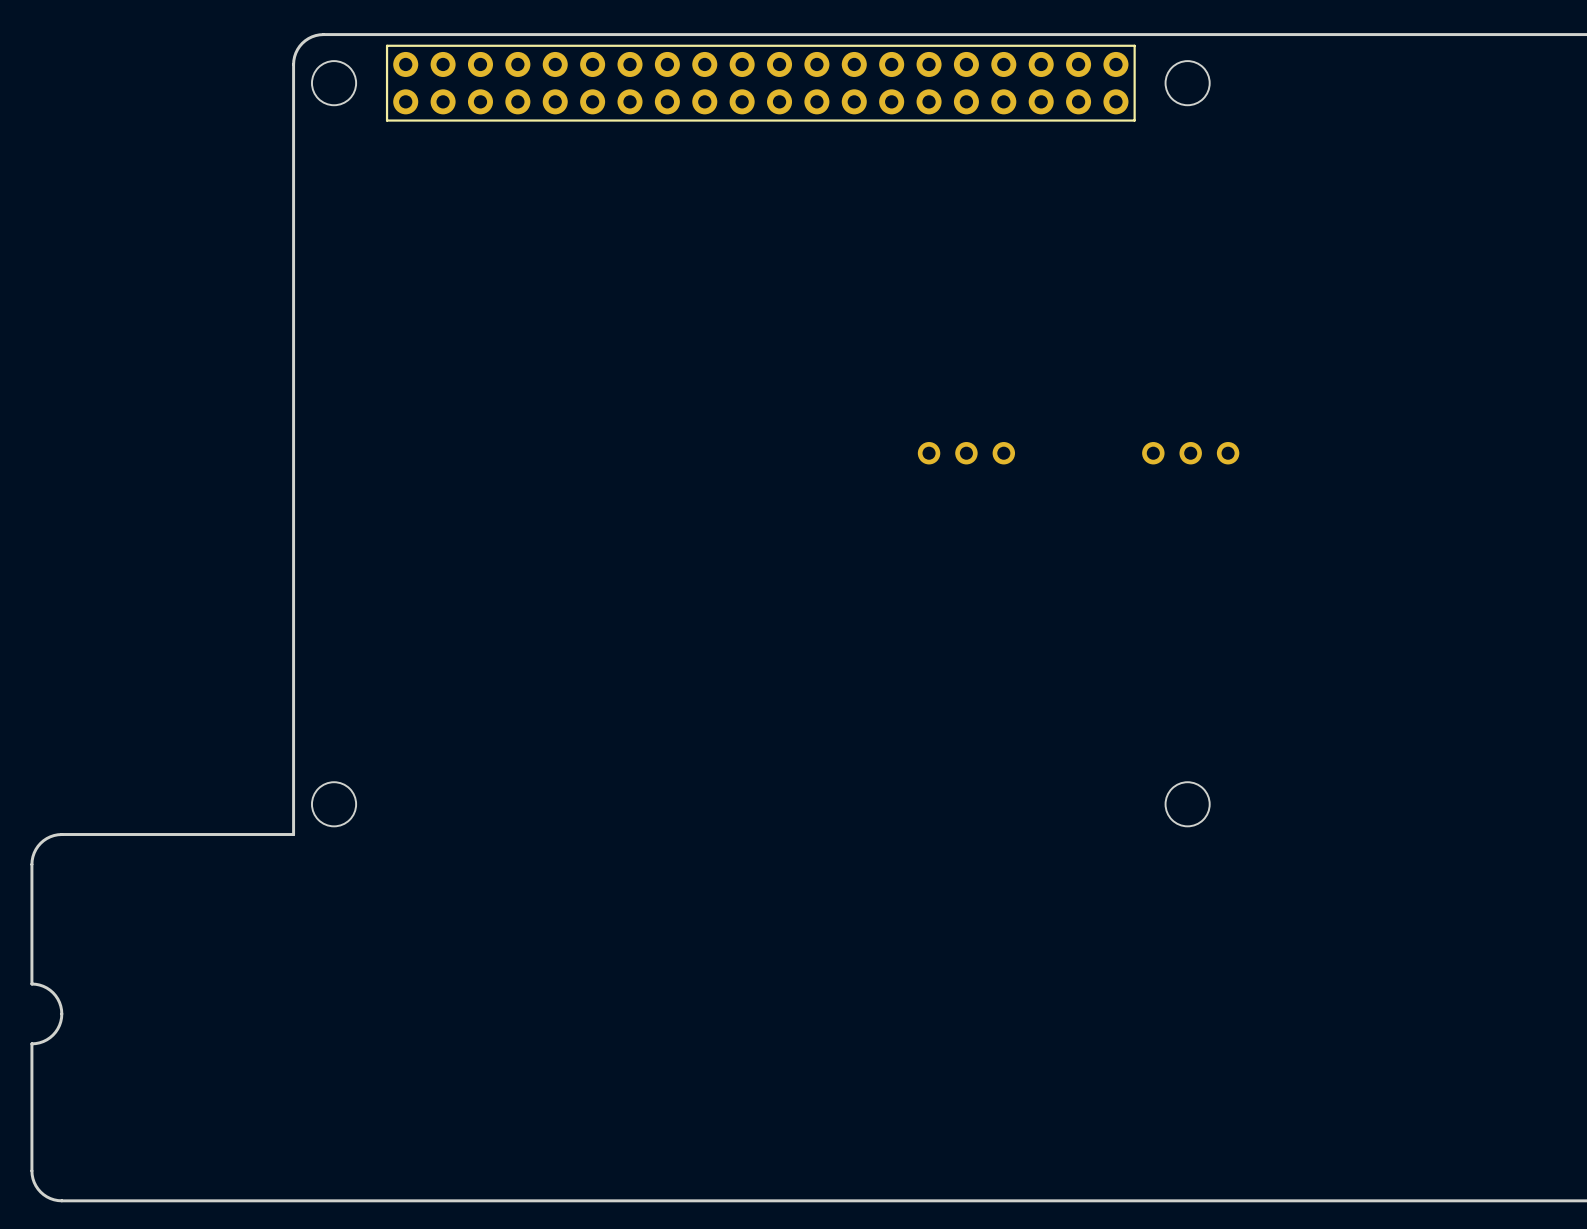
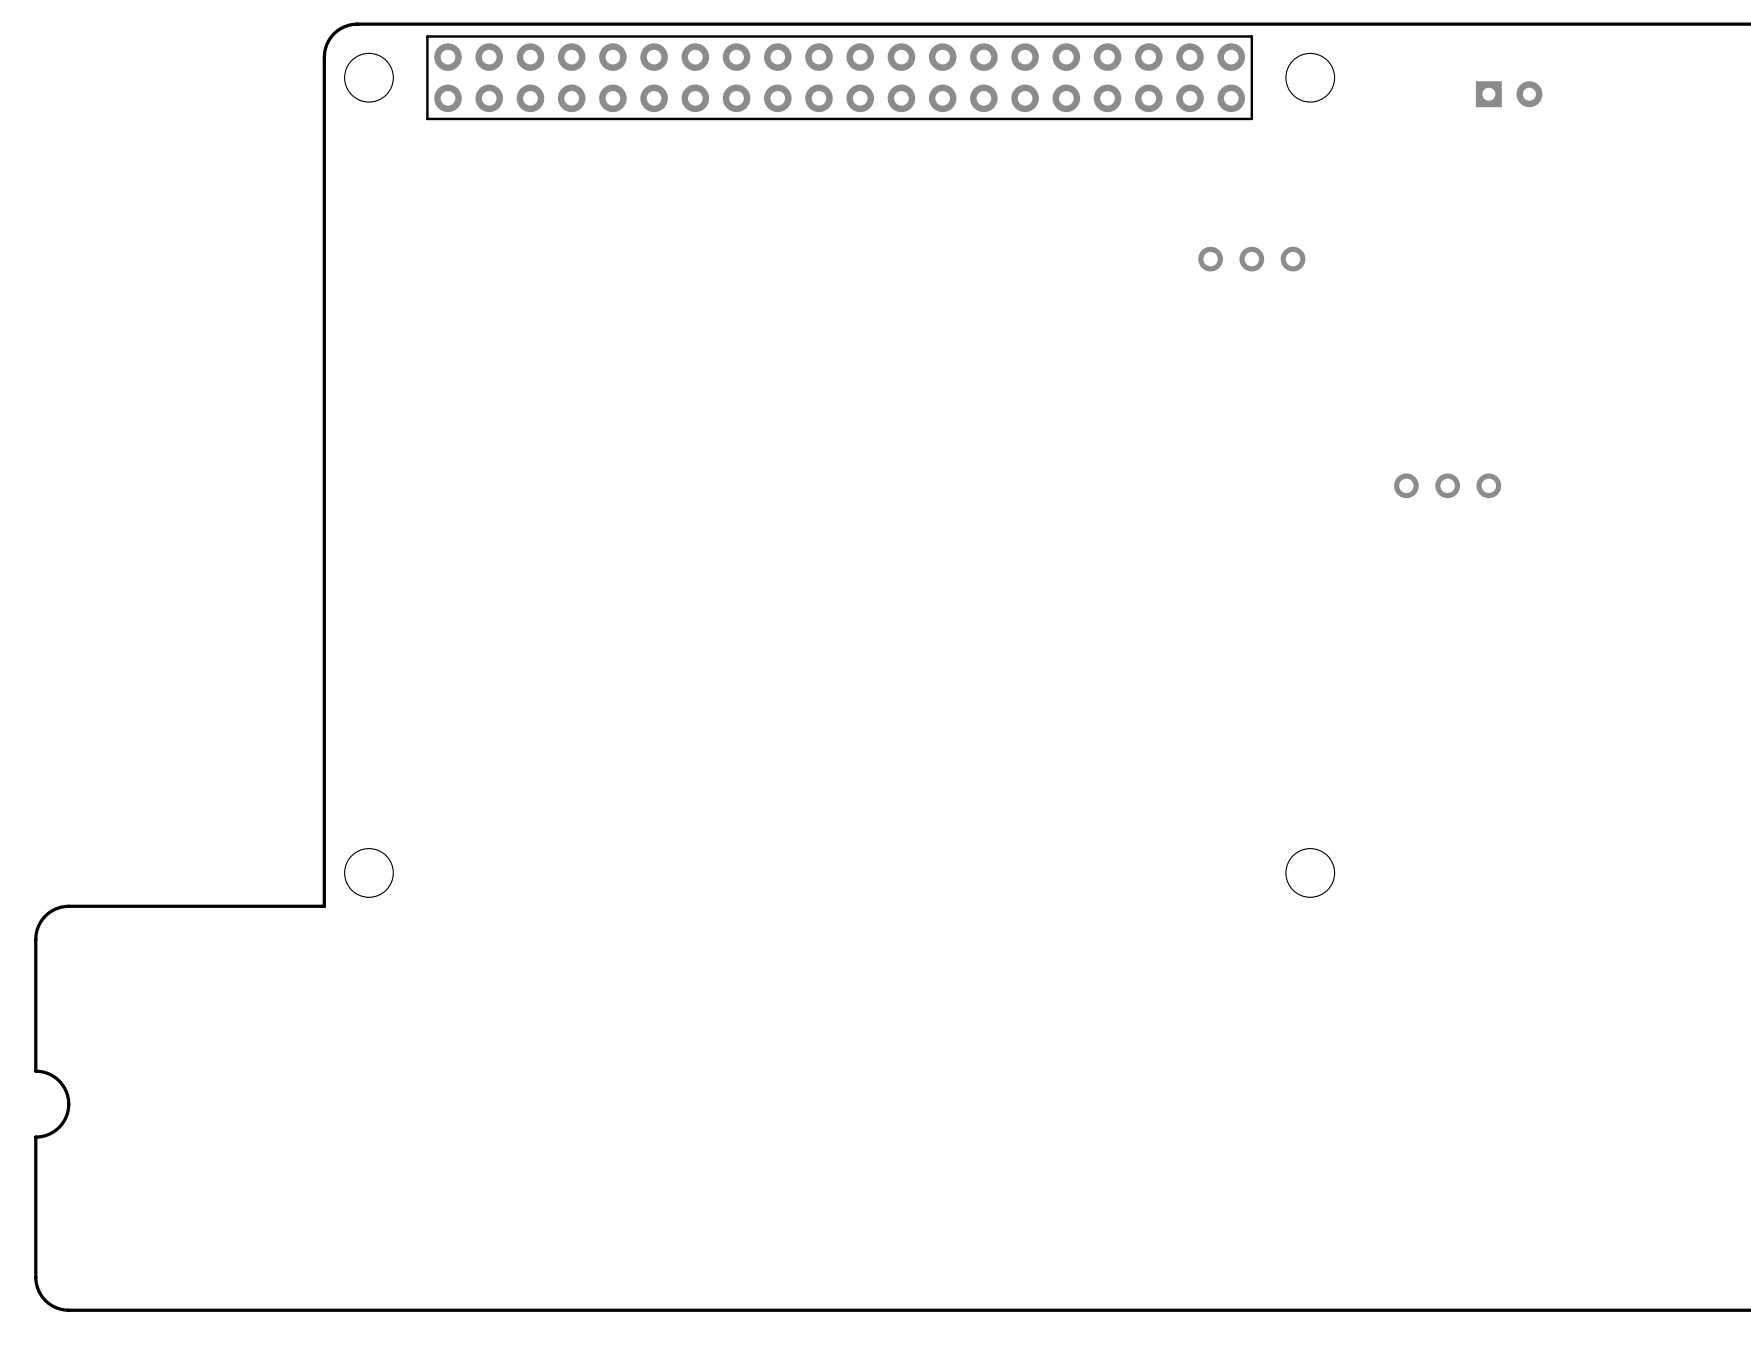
part: none -> (1509, 94)
part: none -> (1251, 259)
part: (966, 453) -> none
part: (1190, 453) -> none
part: none -> (1447, 485)

